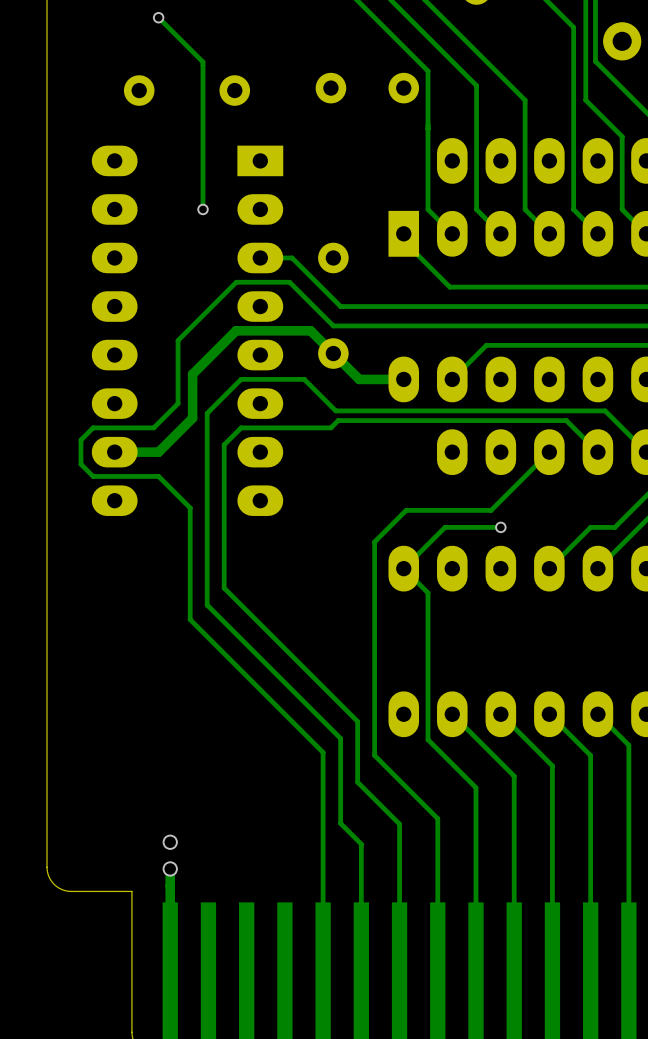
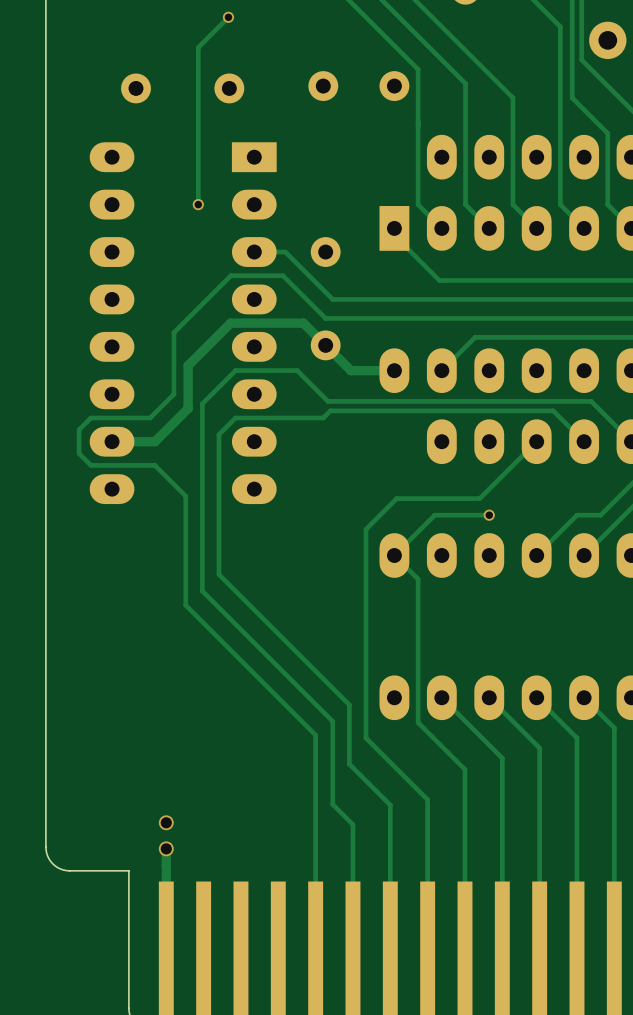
track: (158, 17) (202, 62) -> (228, 17) (198, 47) (198, 60)
via position: (158, 17) -> (228, 17)

